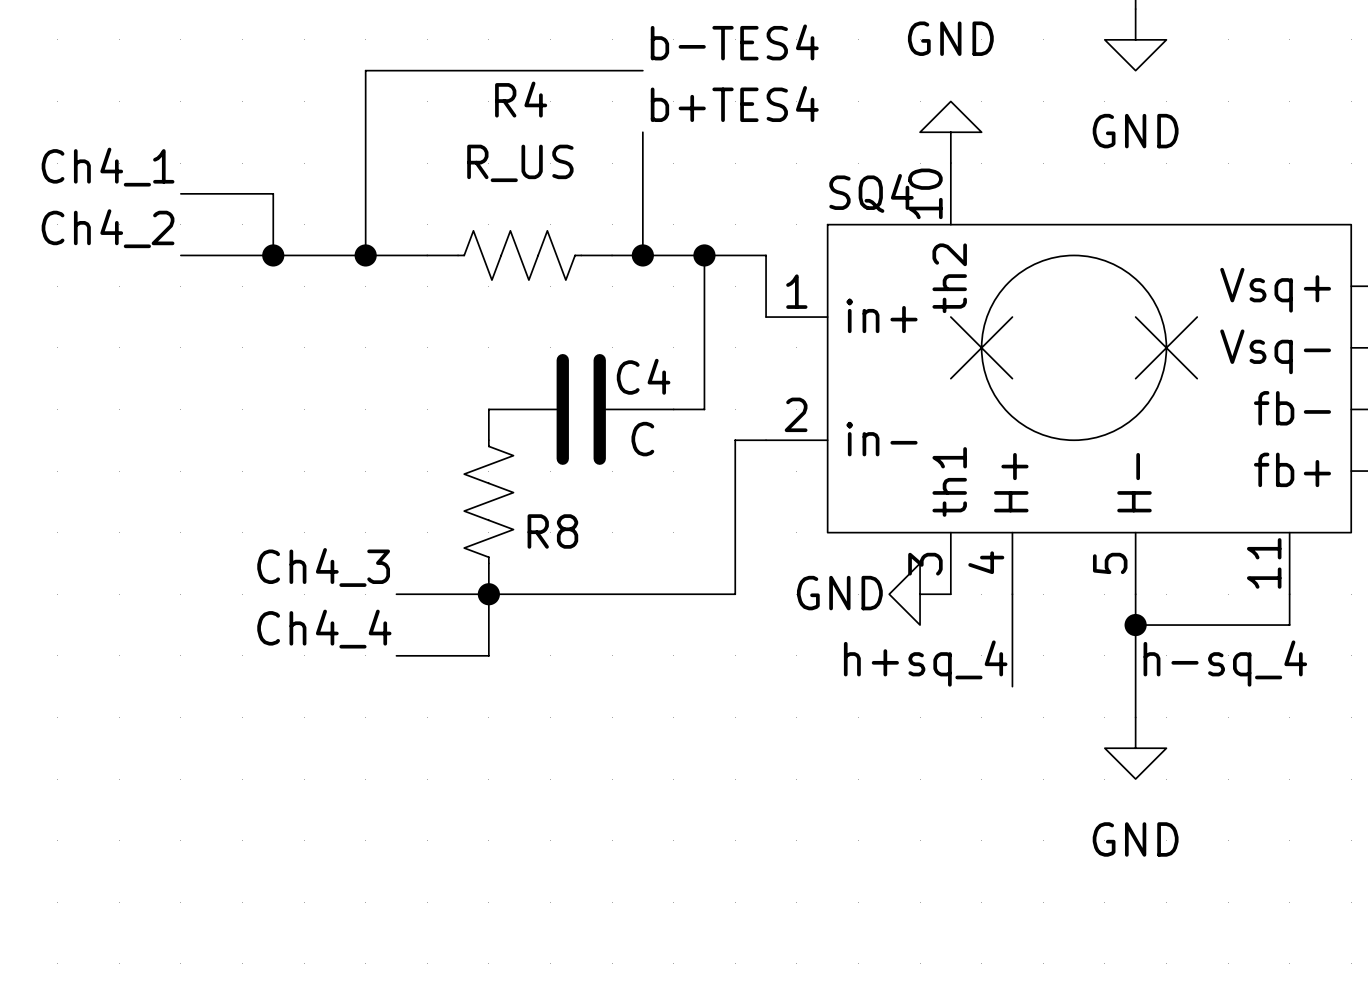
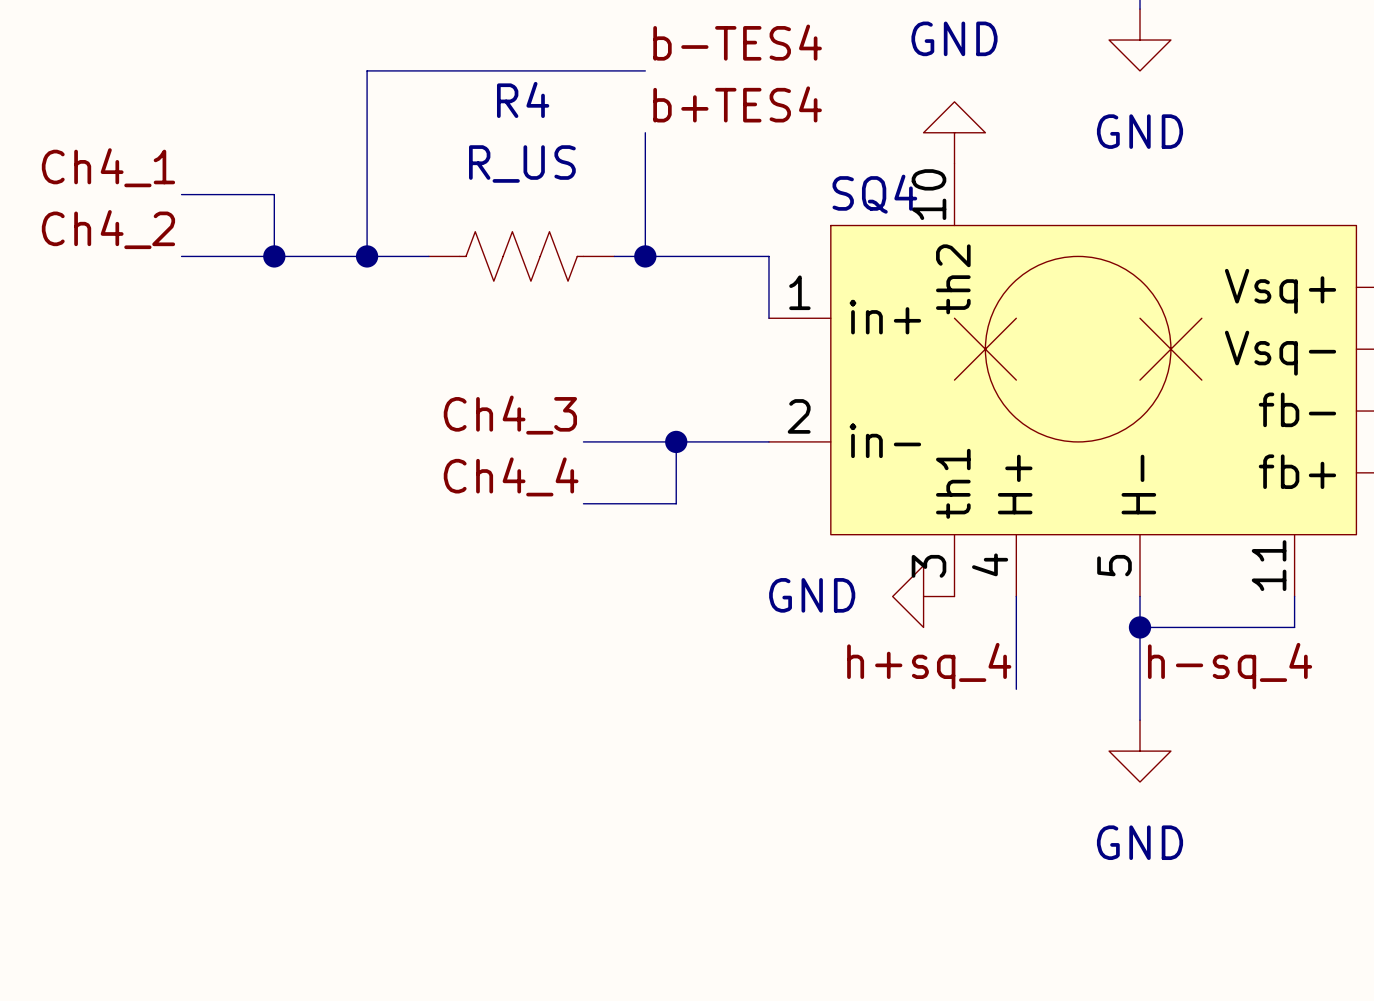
wire: (704, 255) (704, 409) (673, 409) -> none
junction: (704, 255) -> none
C4: C (581, 409) -> none
junction: none -> (676, 441)
wire: (735, 440) (735, 594) (396, 594) -> (738, 441) (583, 441)
R8: (488, 501) -> none
label position: Ch4_3 (323, 567) -> Ch4_3 (510, 415)
power symbol text position: GND (839, 593) -> GND (812, 595)
wire: (488, 594) (488, 655) (396, 655) -> (676, 441) (676, 503) (583, 503)
junction: (488, 594) -> none
label position: Ch4_4 (324, 629) -> Ch4_4 (511, 476)

